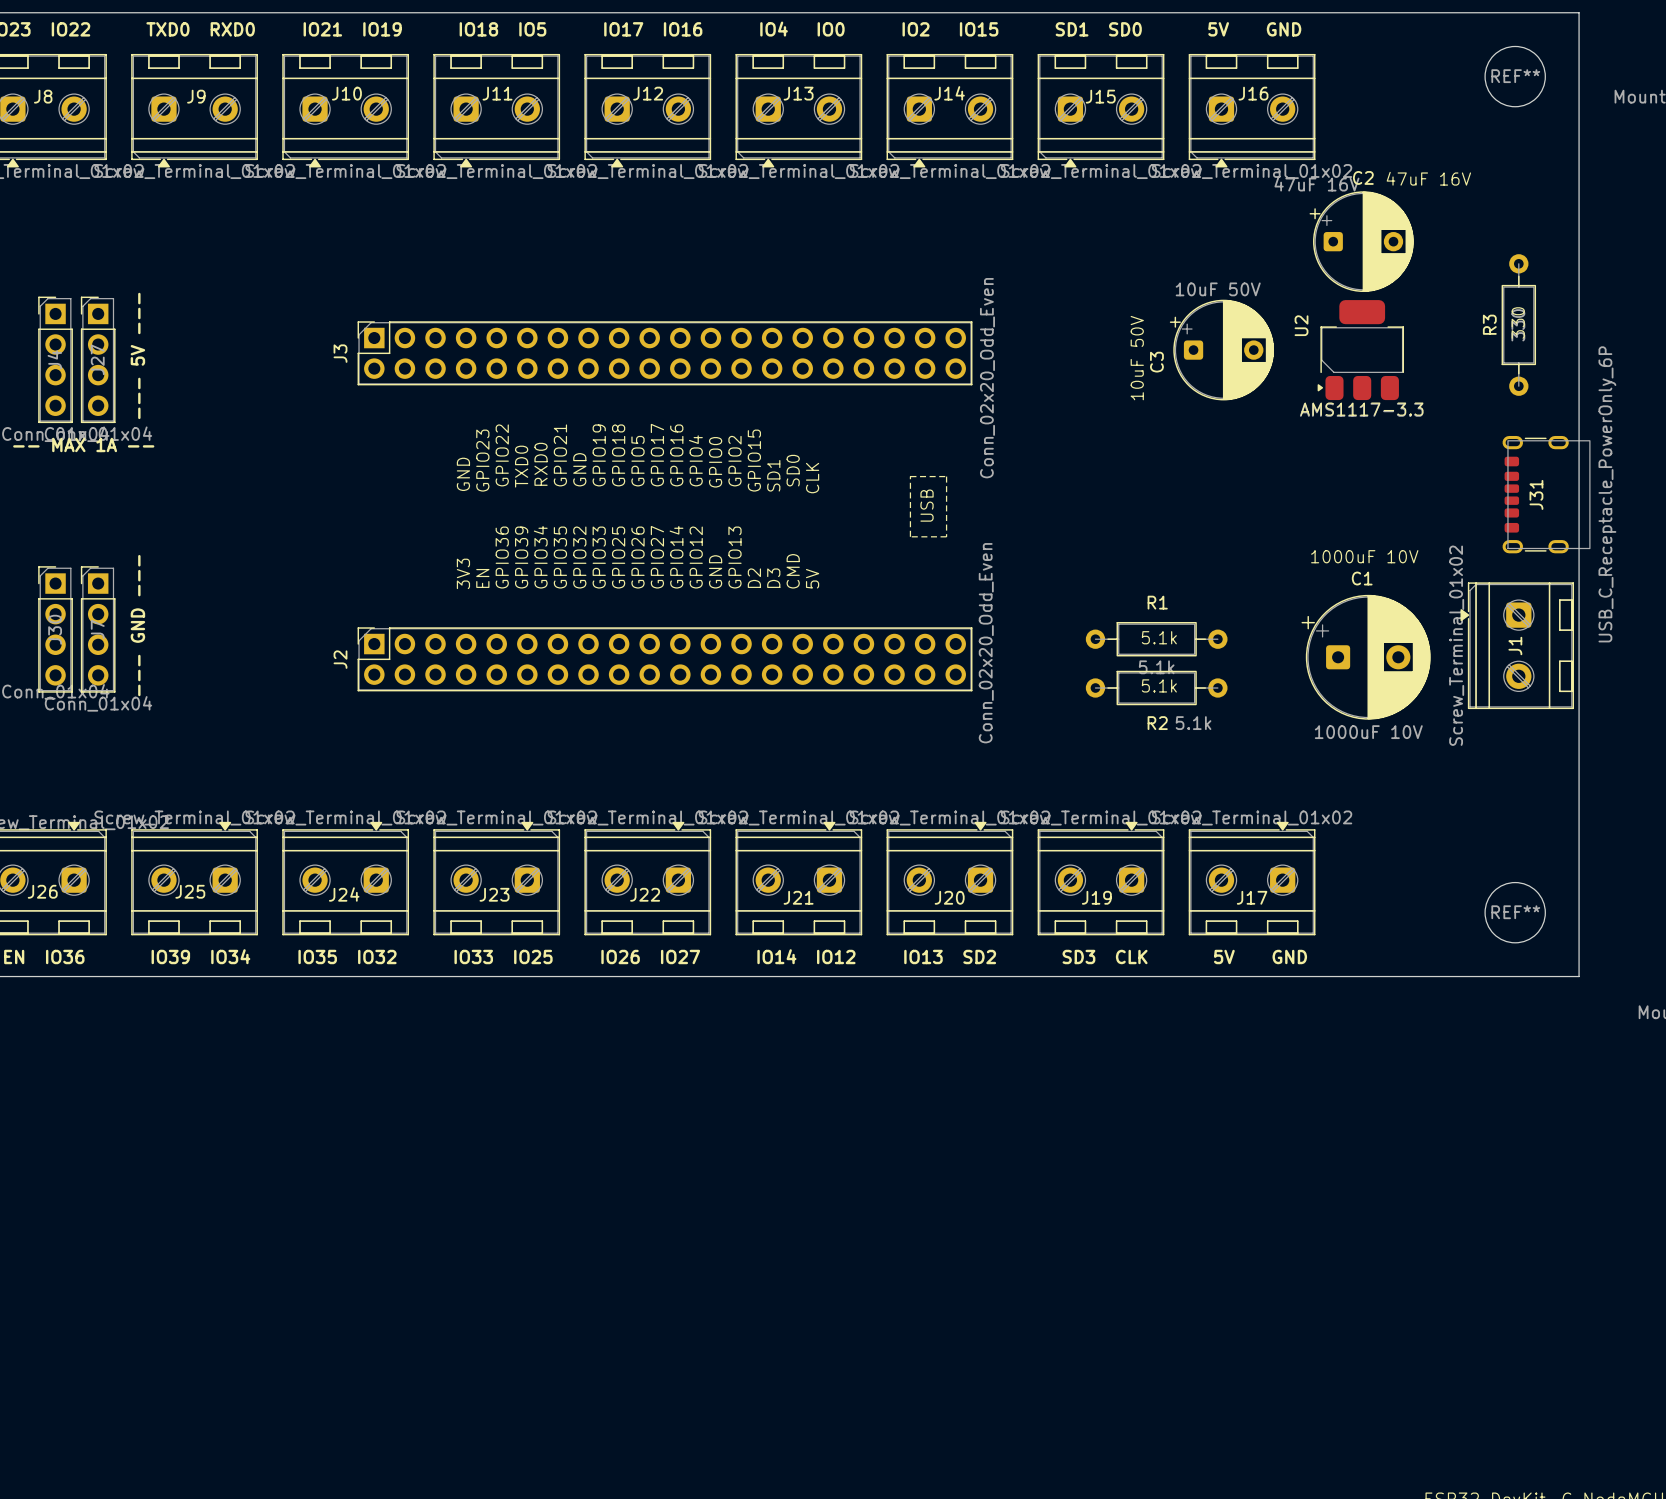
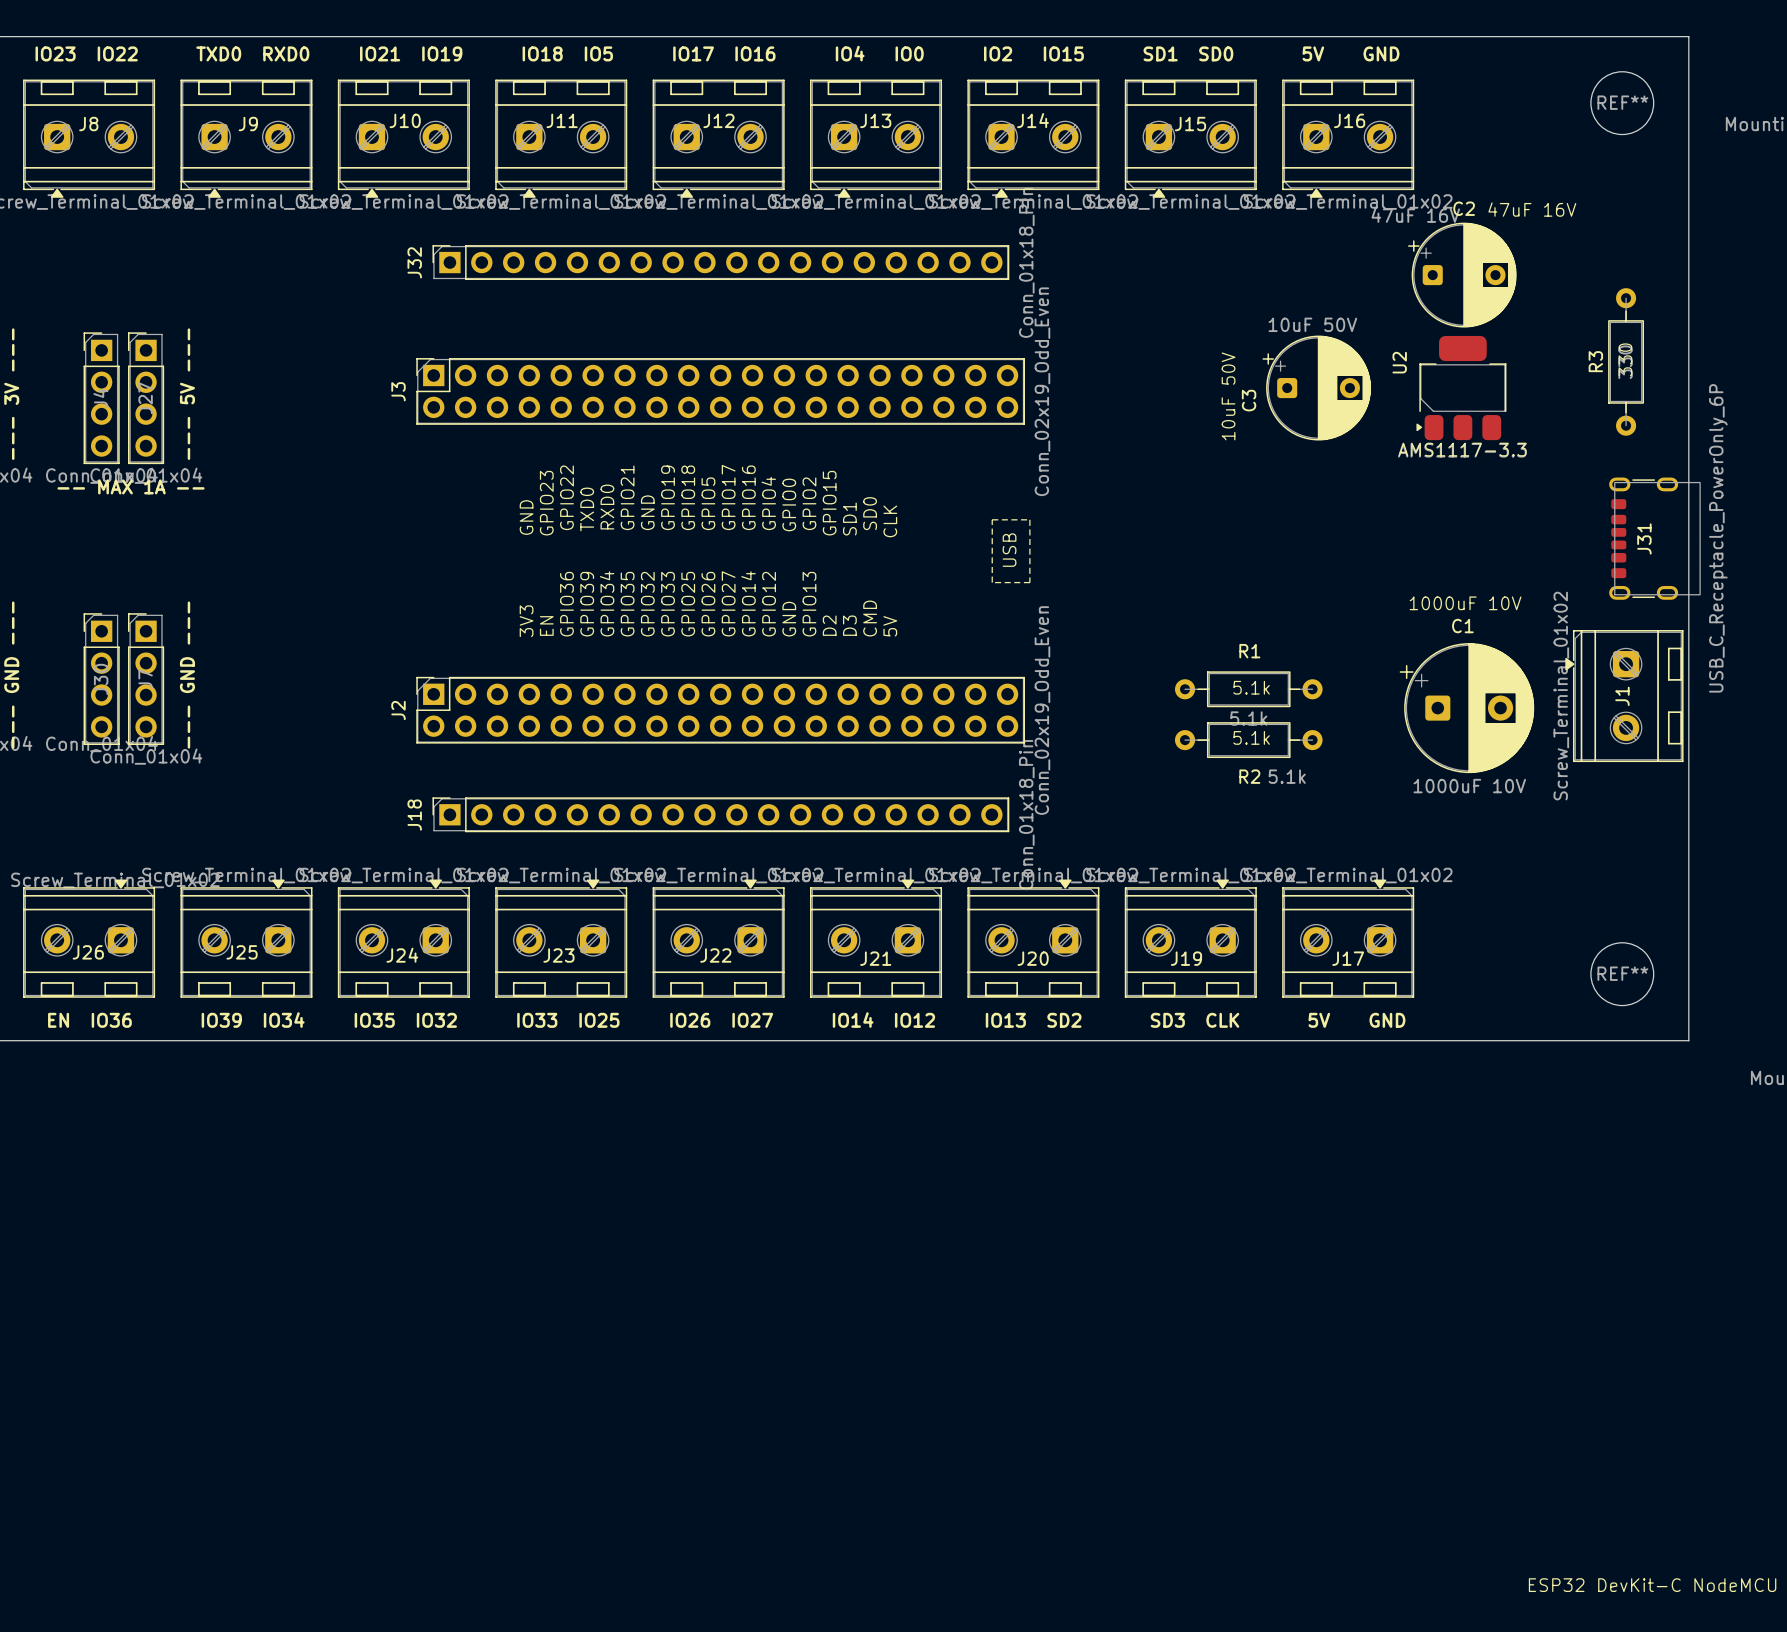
J32: none -> Conn_01x18_Pin (720, 262)
J3 footprint: [357, 321, 973, 386] -> [416, 358, 1026, 425]
J3 value: Conn_02x20_Odd_Even (987, 378) -> Conn_02x19_Odd_Even (1042, 391)
J2 footprint: [357, 627, 973, 692] -> [416, 676, 1026, 744]
J2 value: Conn_02x20_Odd_Even (986, 643) -> Conn_02x19_Odd_Even (1042, 710)
J18: none -> Conn_01x18_Pin (720, 814)

